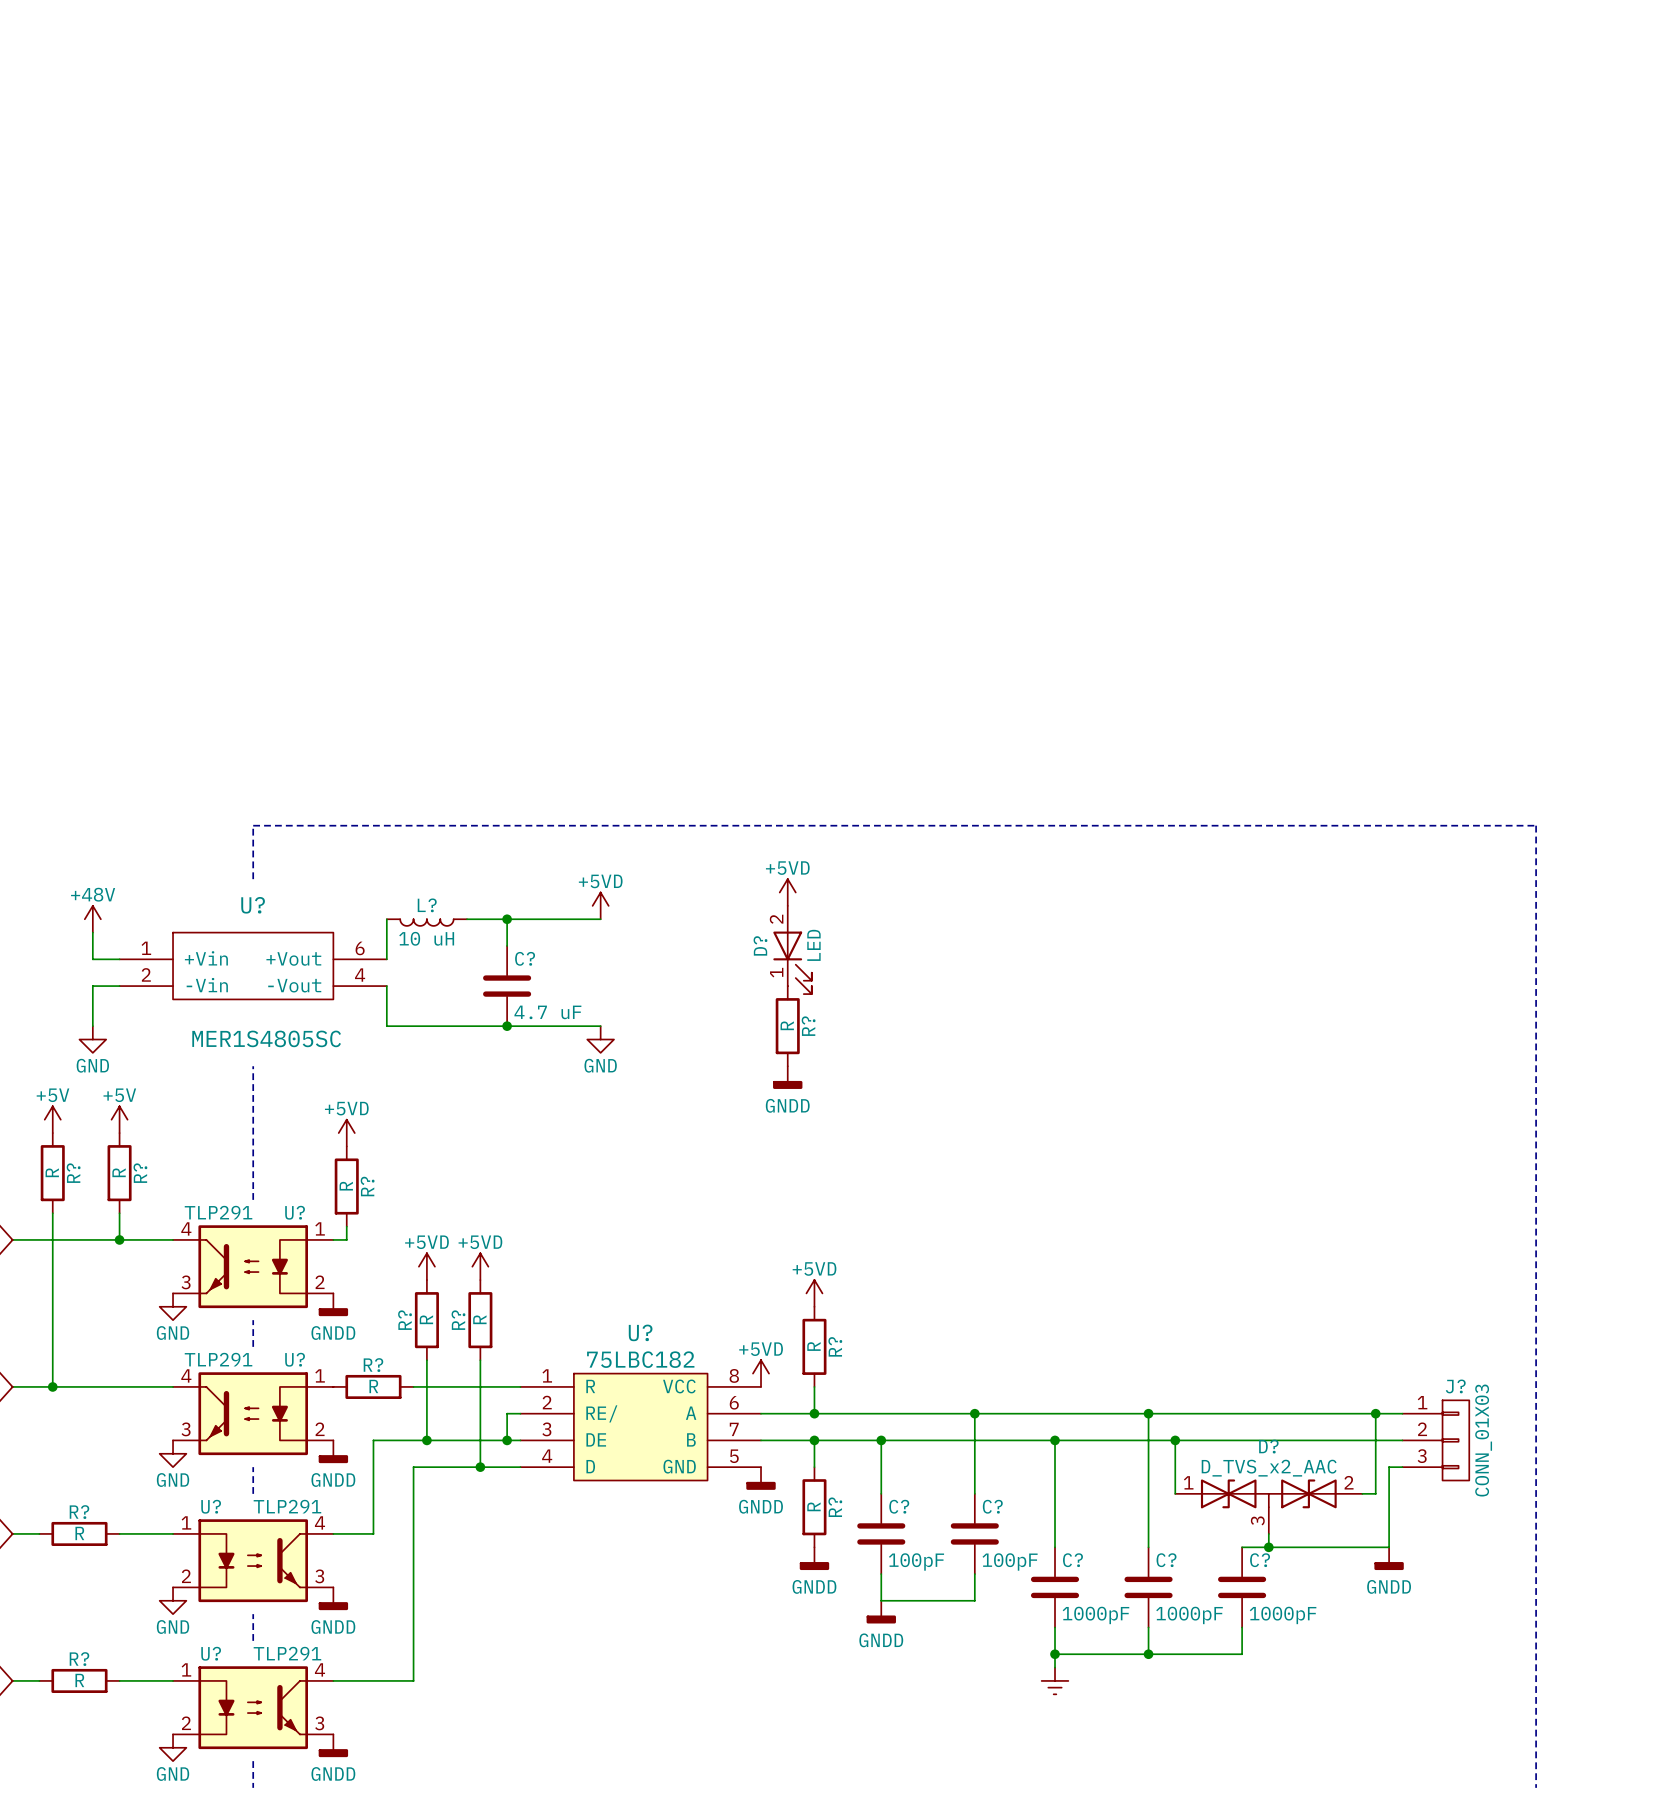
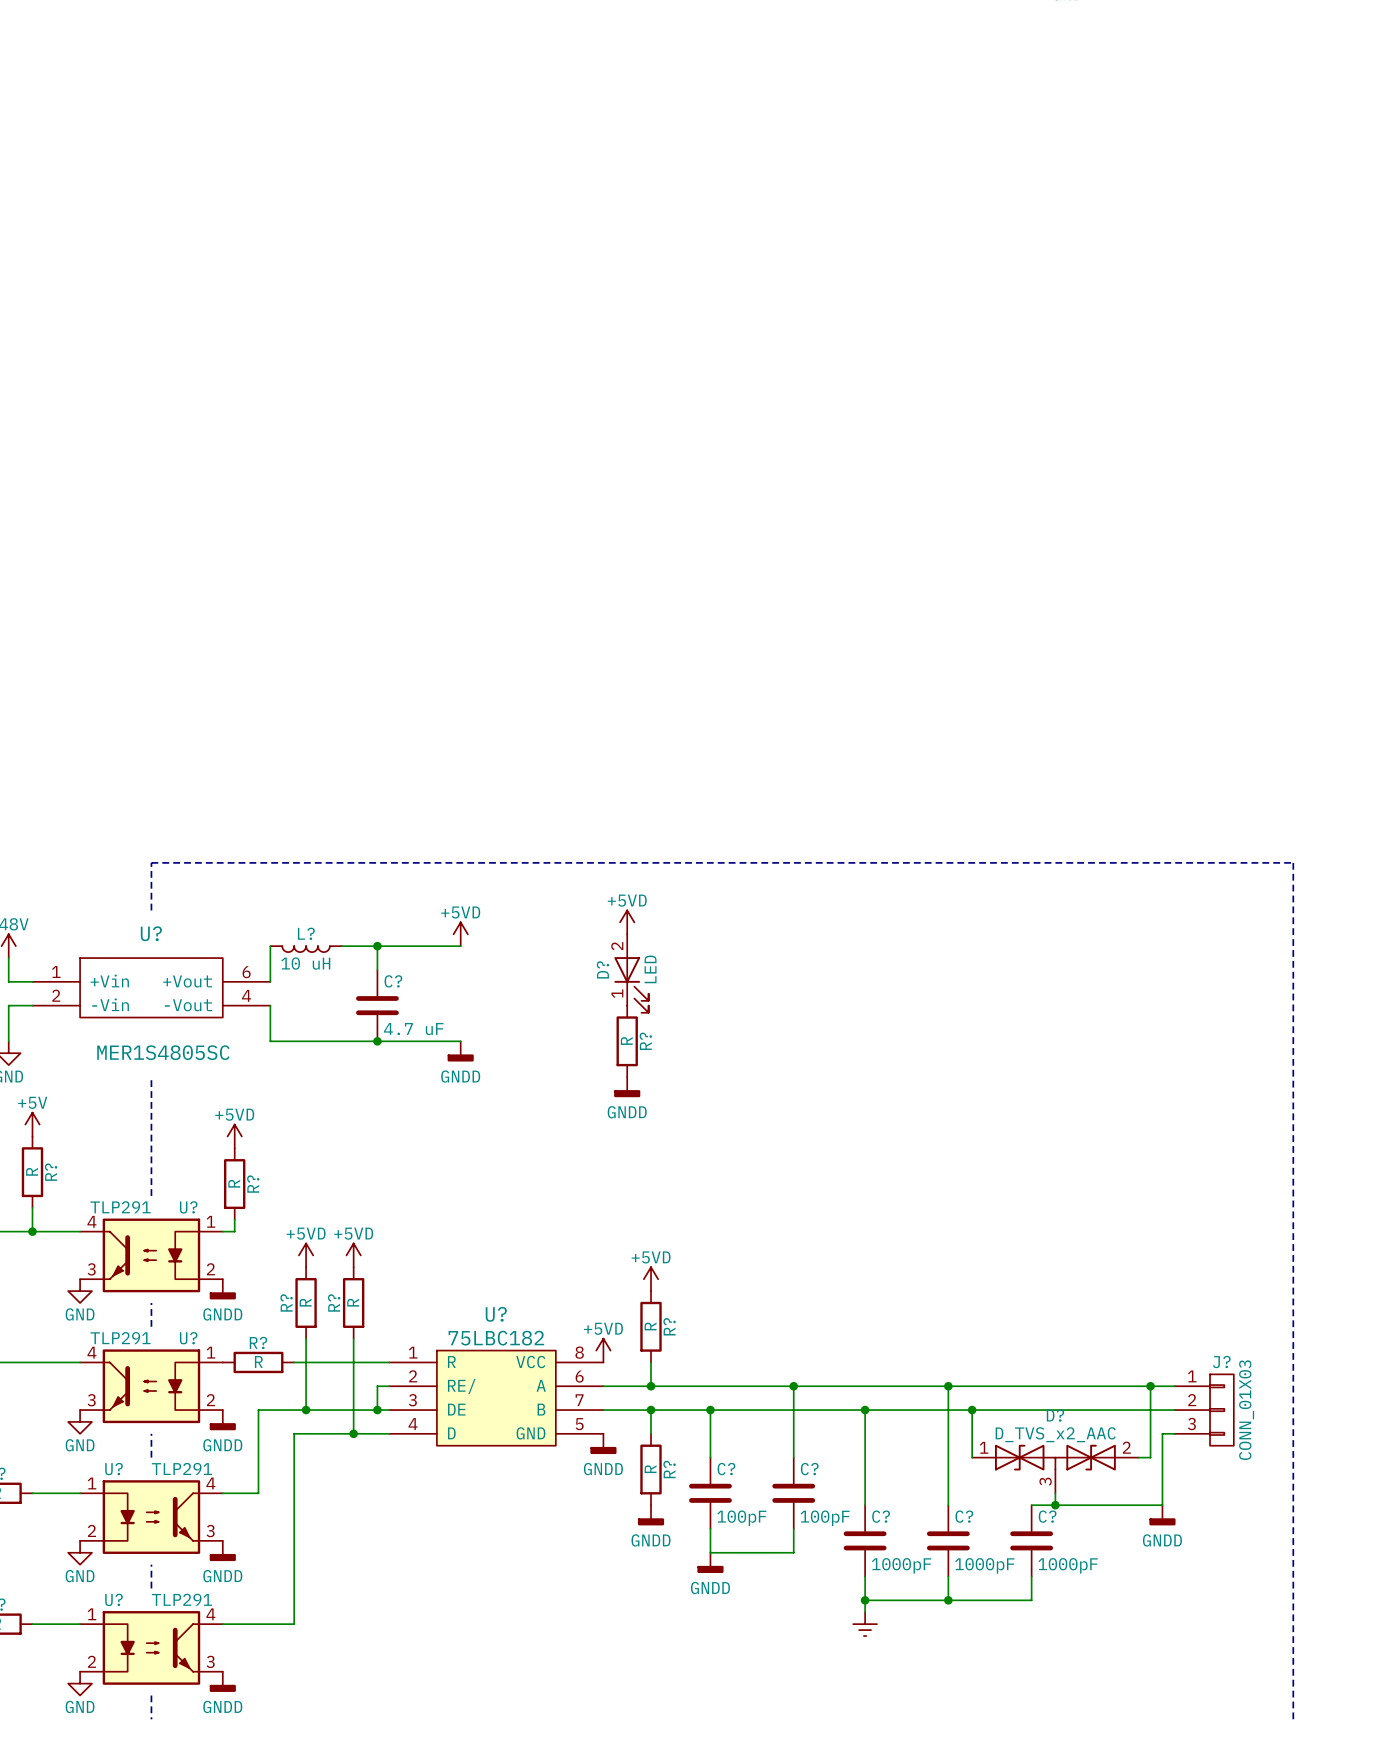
power symbol: GND (600, 1039) -> GNDD (460, 1051)

